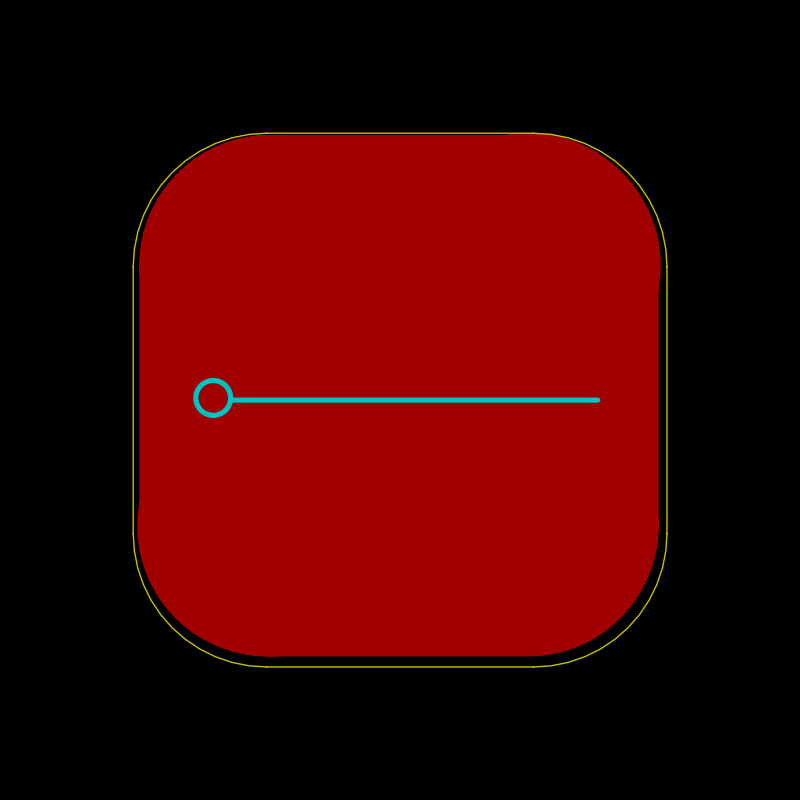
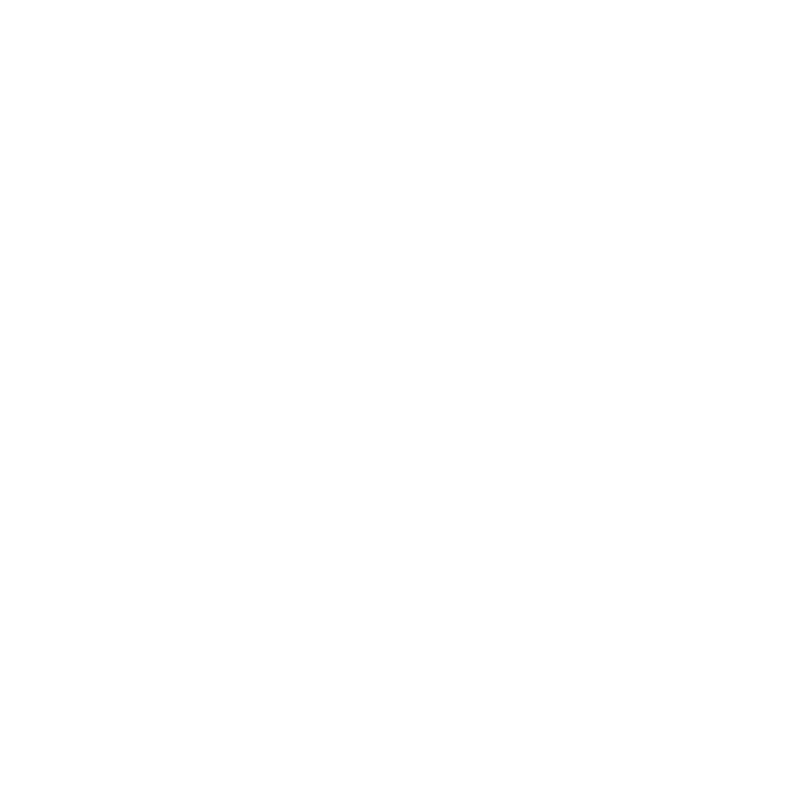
part: (400, 400) -> none

